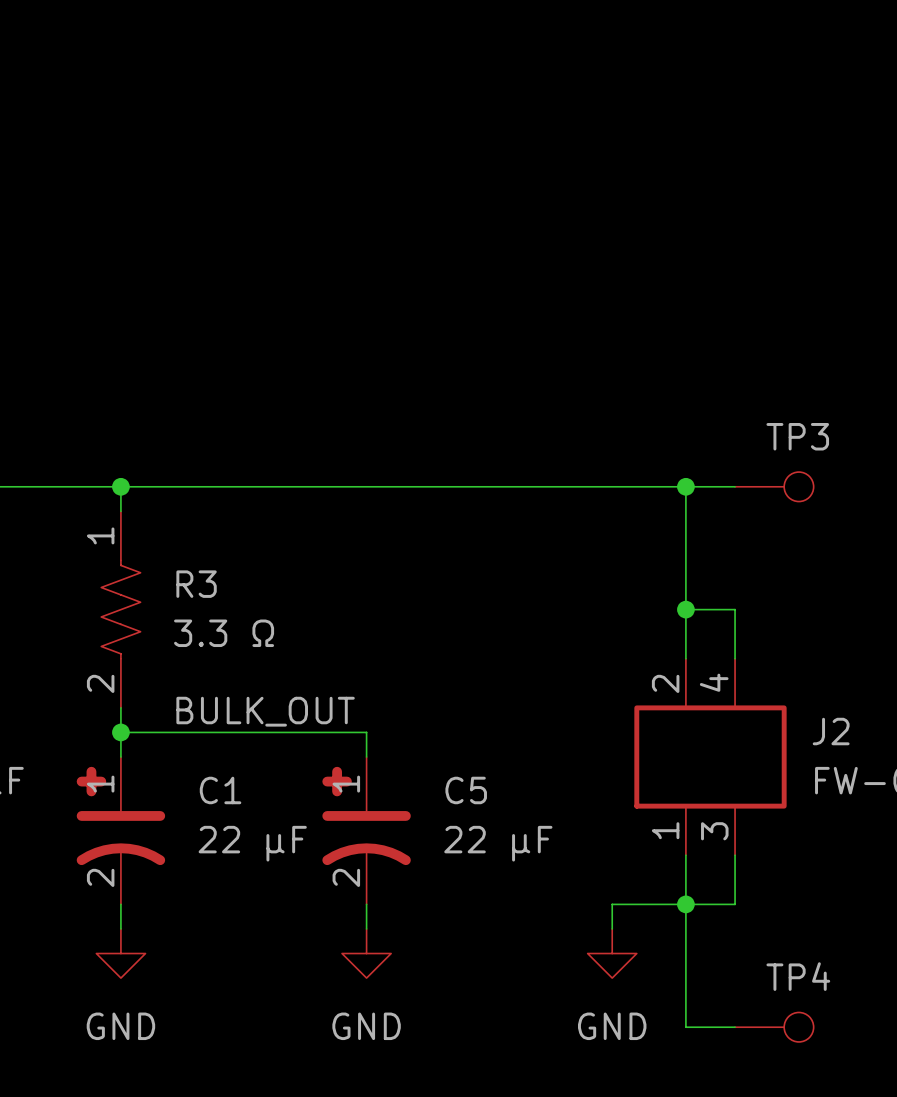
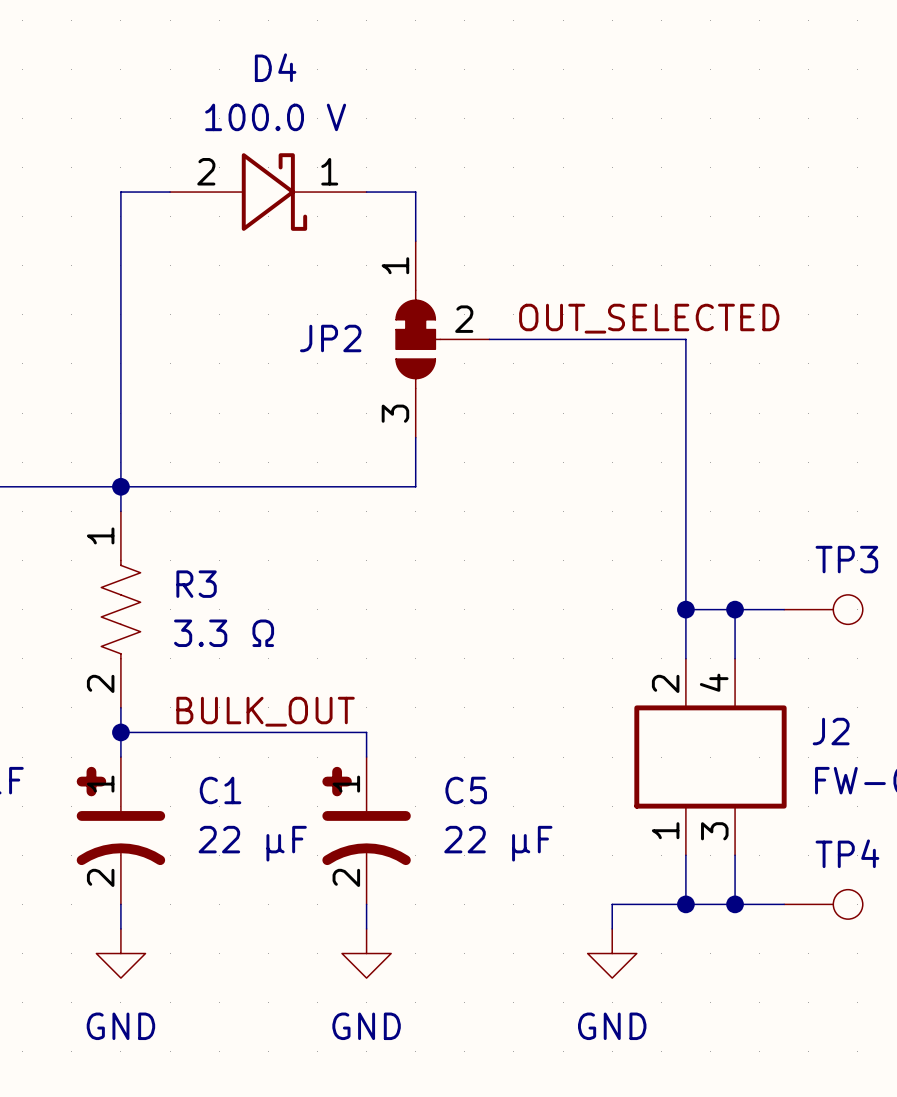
wire: none -> (170, 192) (120, 192) (120, 486)
D4: none -> 100.0 V (268, 192)
wire: none -> (366, 192) (415, 192) (415, 241)
label: none -> OUT_SELECTED (649, 318)
JP2: none -> (442, 339)
wire: none -> (489, 339) (685, 339) (685, 486)
wire: (415, 486) (735, 486) -> (415, 486) (415, 437)
junction: (685, 486) -> none
TP3 position: (774, 486) -> (823, 609)
wire: none -> (735, 609) (784, 609)
junction: none -> (735, 609)
wire: (685, 904) (685, 1027) (735, 1027) -> none
wire: none -> (735, 904) (784, 904)
junction: none -> (735, 904)
TP4 position: (774, 1027) -> (823, 904)

